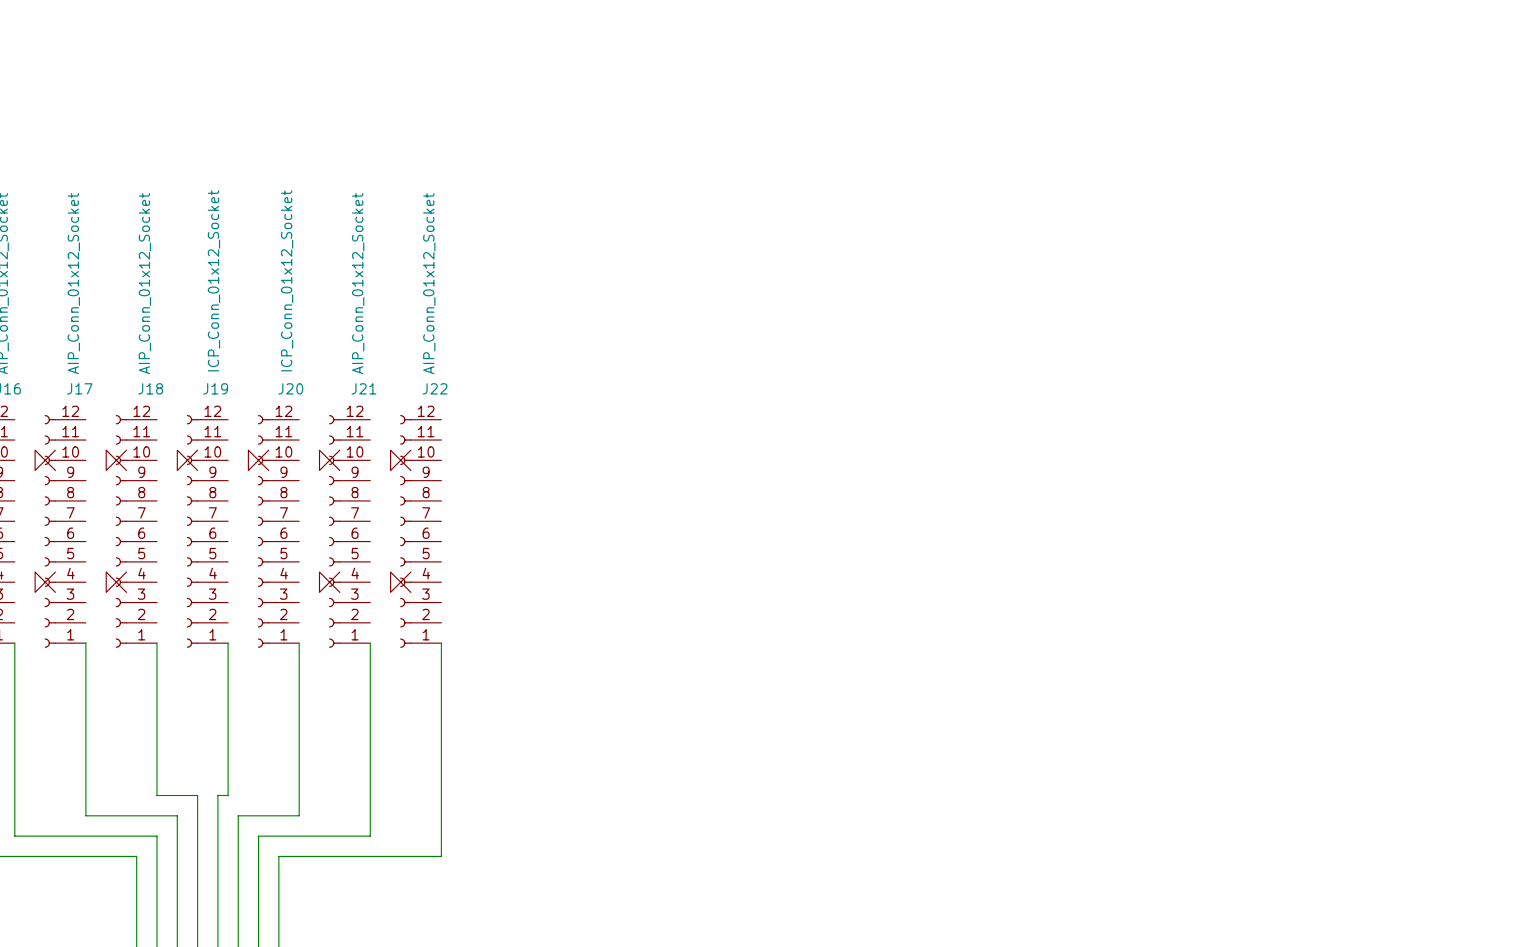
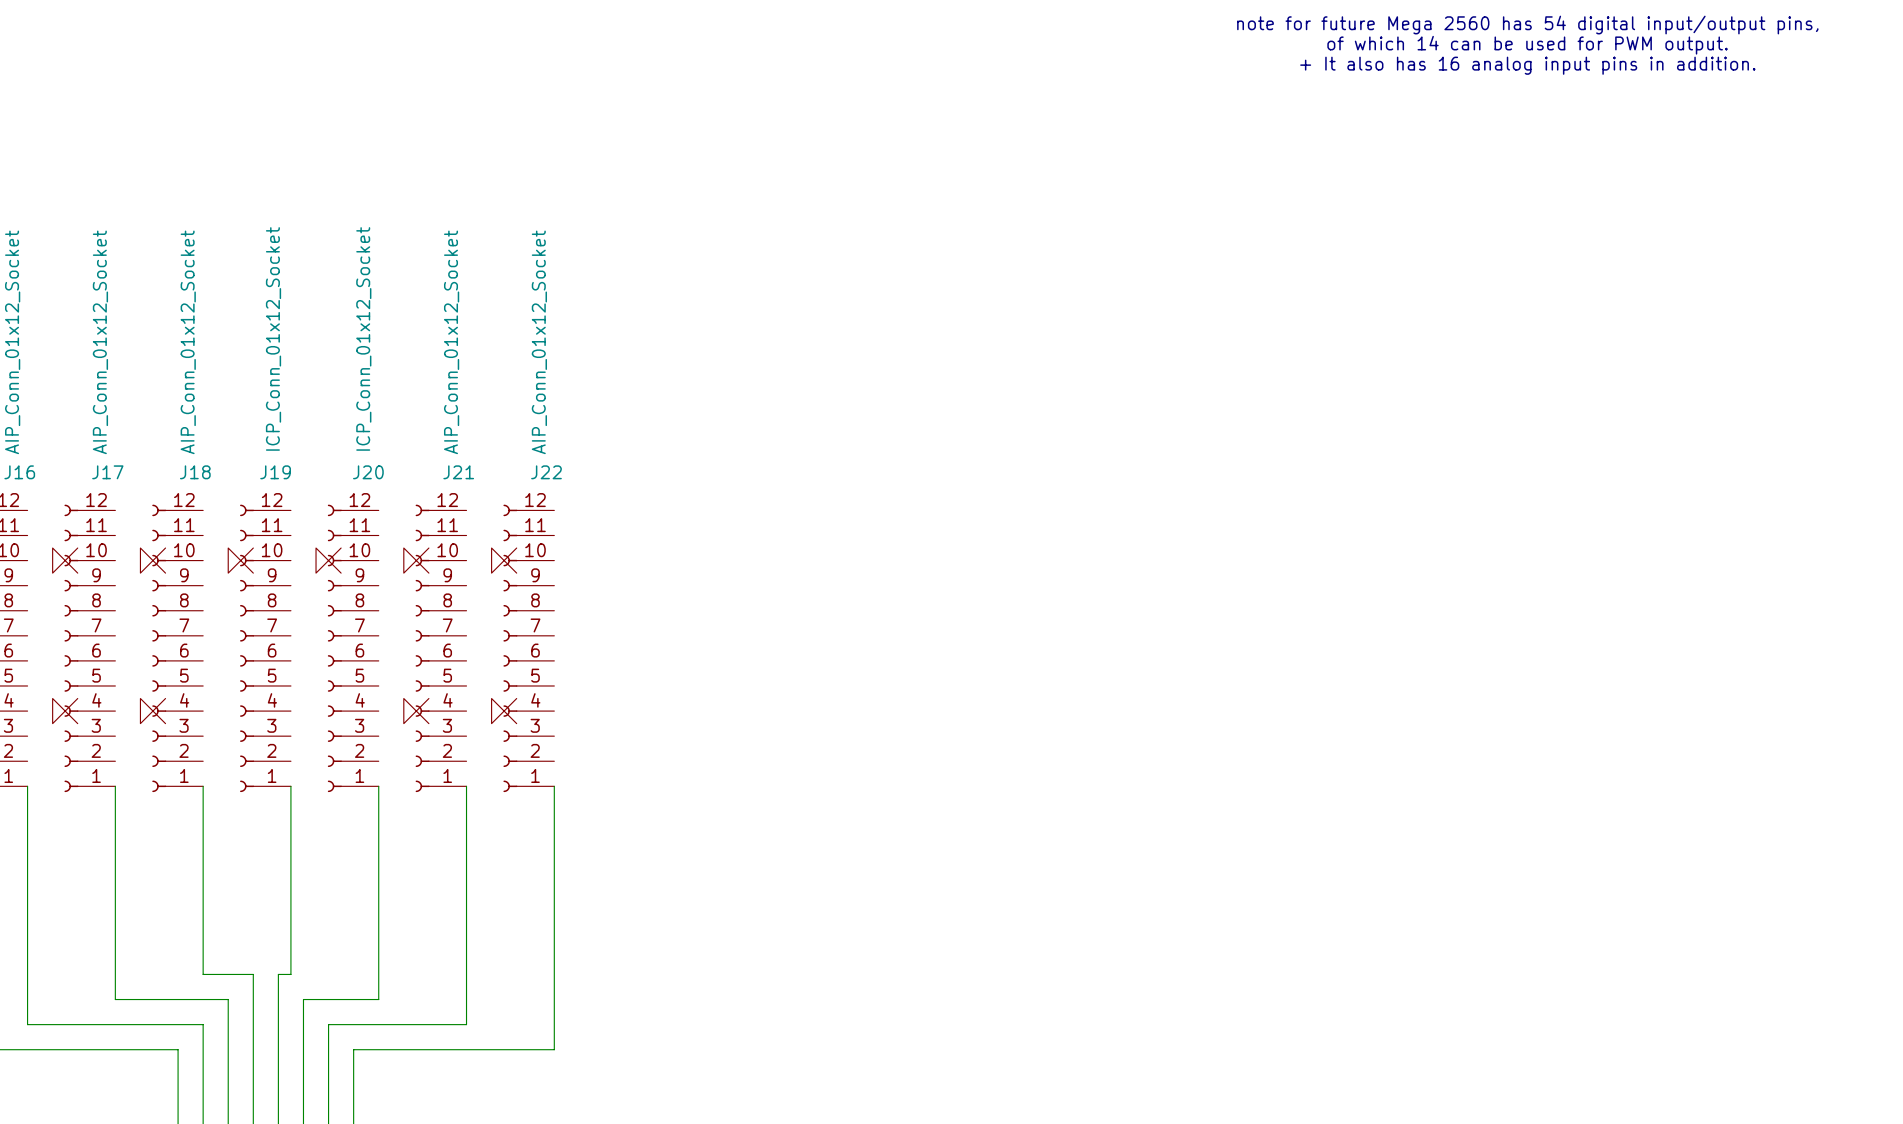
text: none -> note for future Mega 2560 has 54 digital input/output pins, (1527, 25)
text: none -> of which 14 can be used for PWM output. (1527, 45)
text: none -> + It also has 16 analog input pins in addition. (1527, 65)

